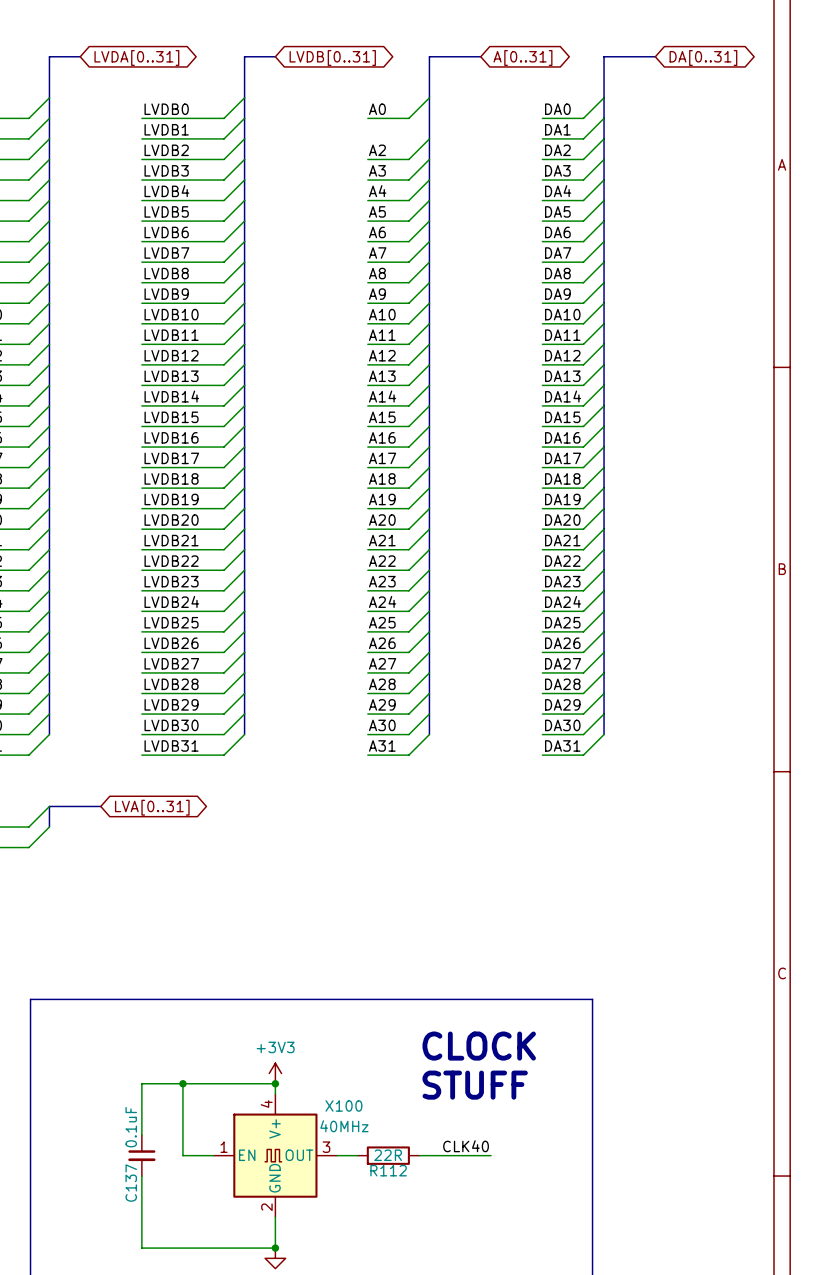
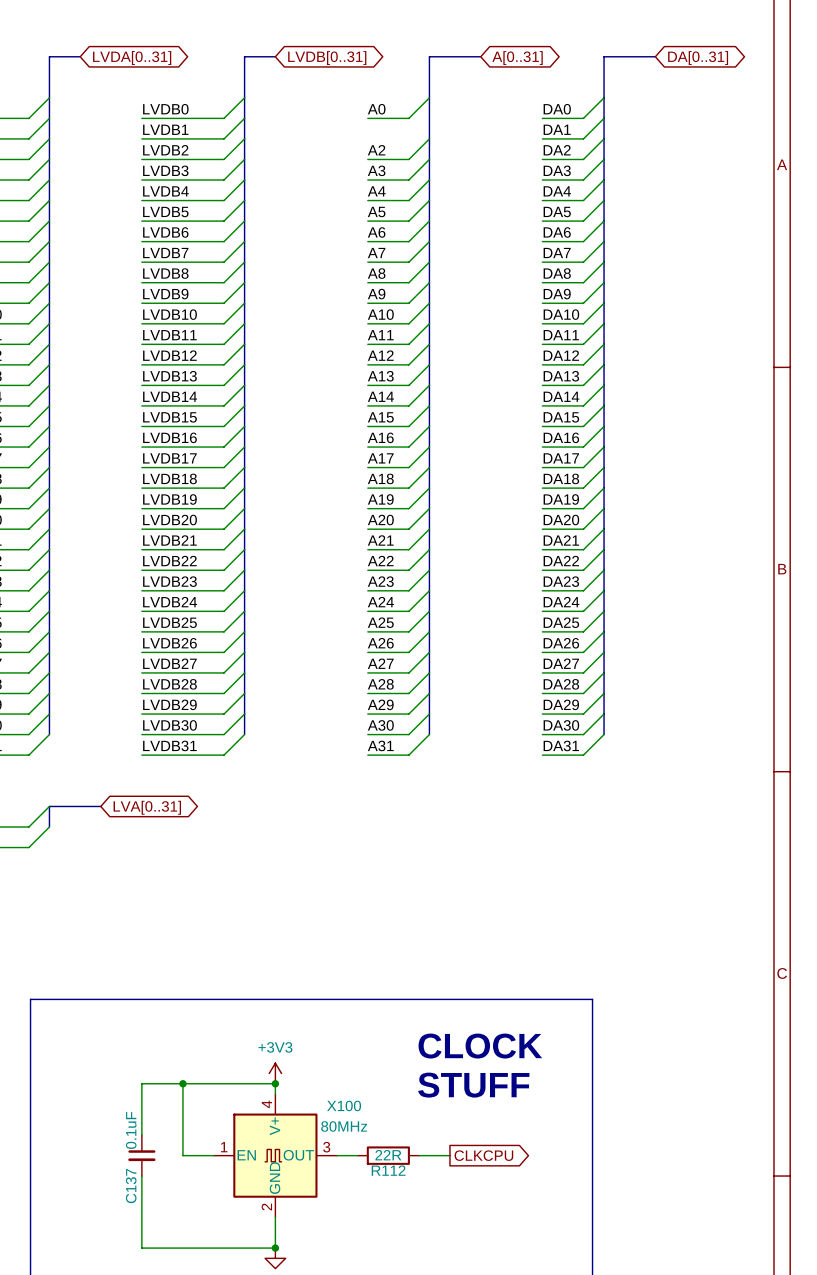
X100 value: 40MHz (344, 1126) -> 80MHz (344, 1126)
label: CLK40 (466, 1146) -> none
wire: (449, 1155) (491, 1155) -> none
global label: none -> CLKCPU (483, 1155)

